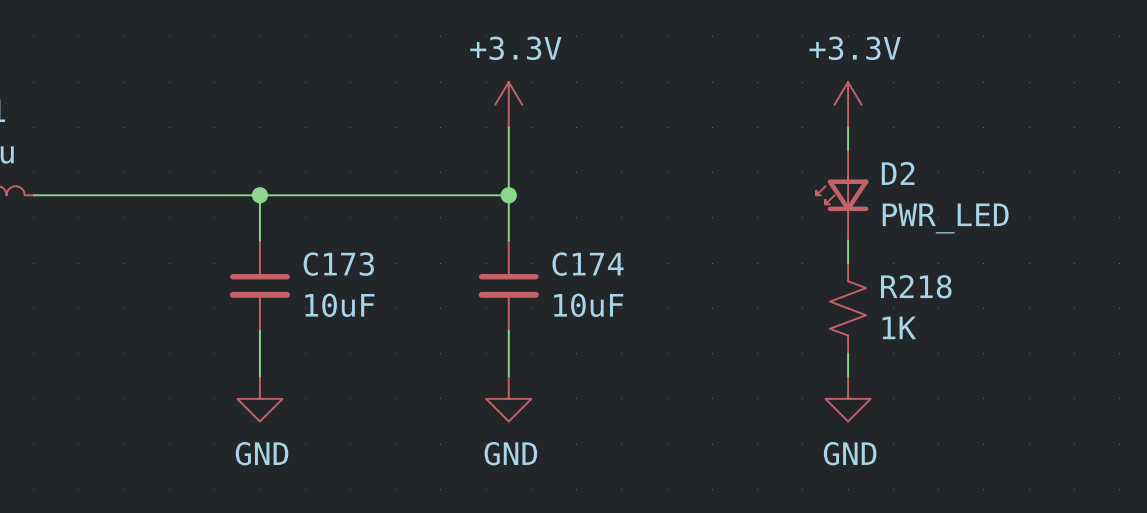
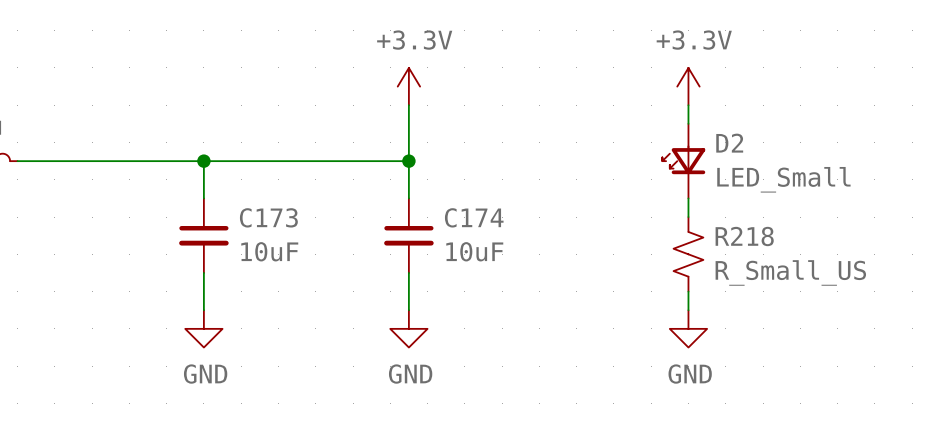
D2 value: PWR_LED (945, 218) -> LED_Small (783, 179)
R218 value: 1K (899, 327) -> R_Small_US (790, 272)

